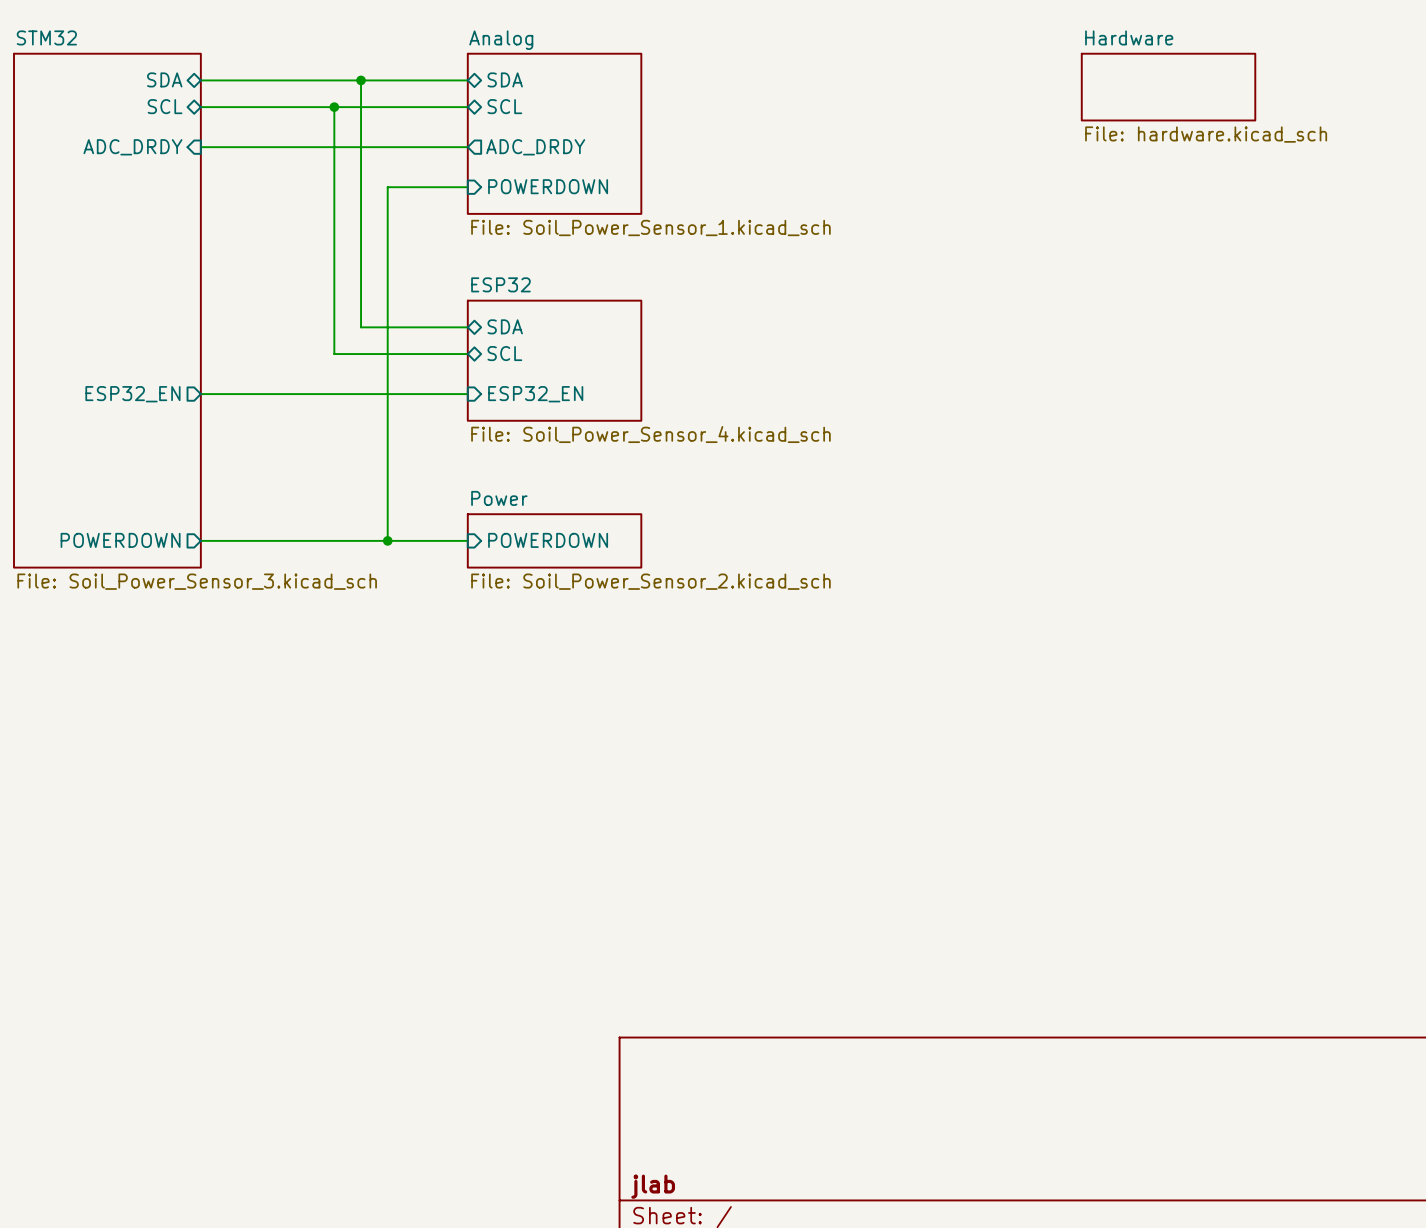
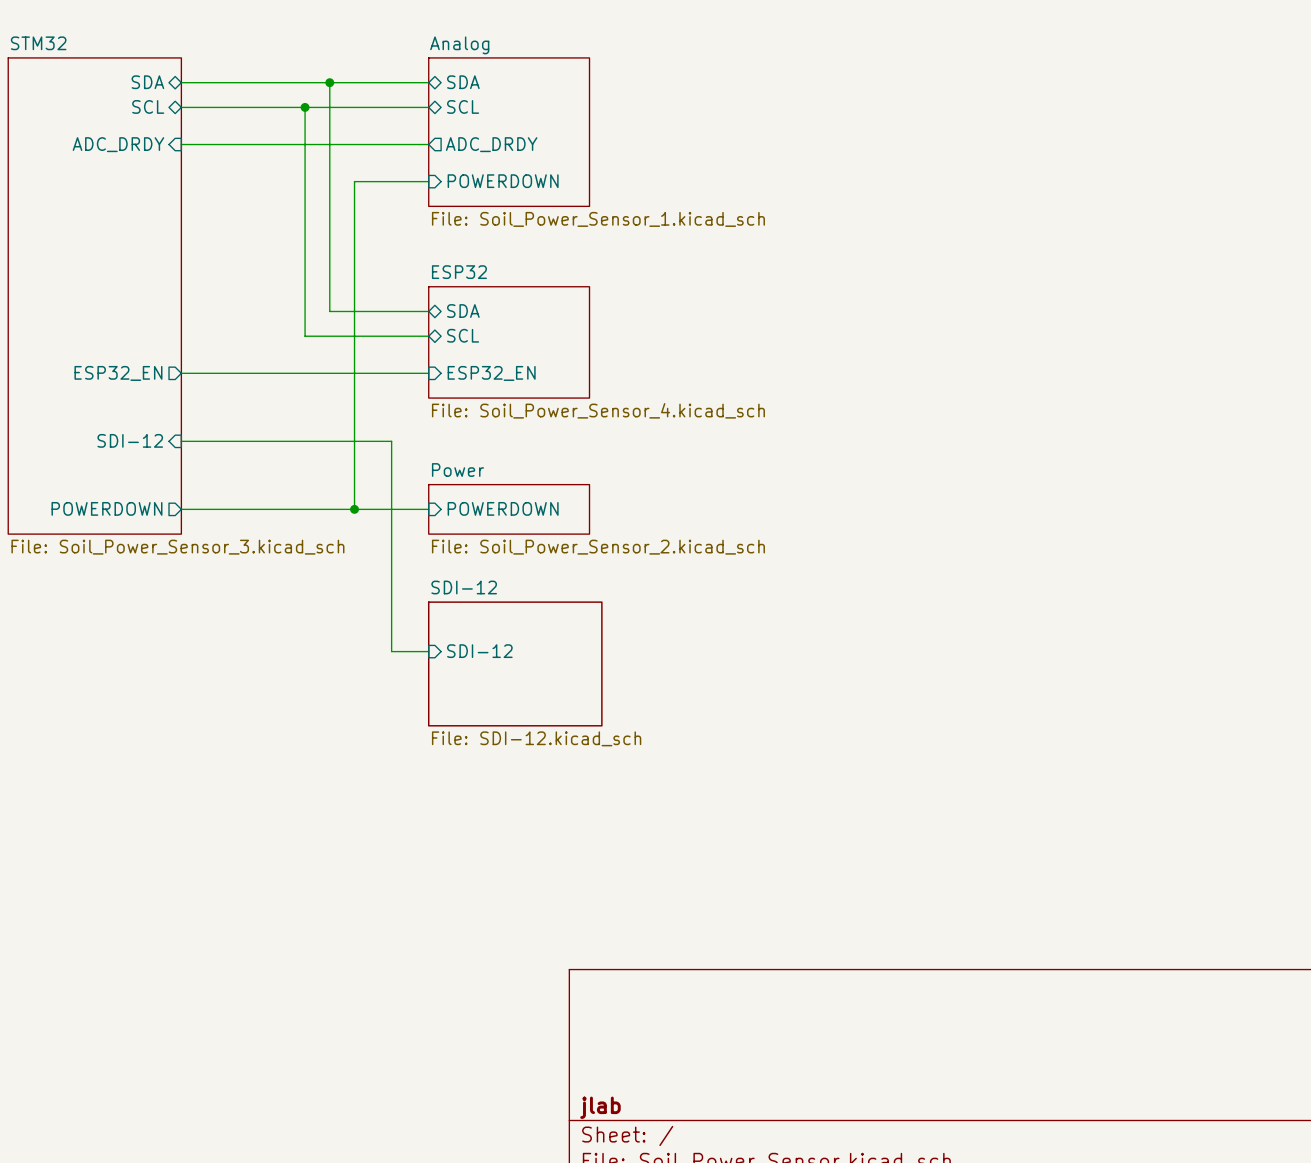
sheet Hardware: File: hardware.kicad_sch (1168, 87) -> none
sheet pin: none -> SDI-12 (130, 440)
wire: none -> (181, 441) (391, 441) (391, 651) (428, 651)
sheet pin: none -> SDI-12 (479, 651)
sheet SDI-12: none -> File: SDI-12.kicad_sch (515, 663)

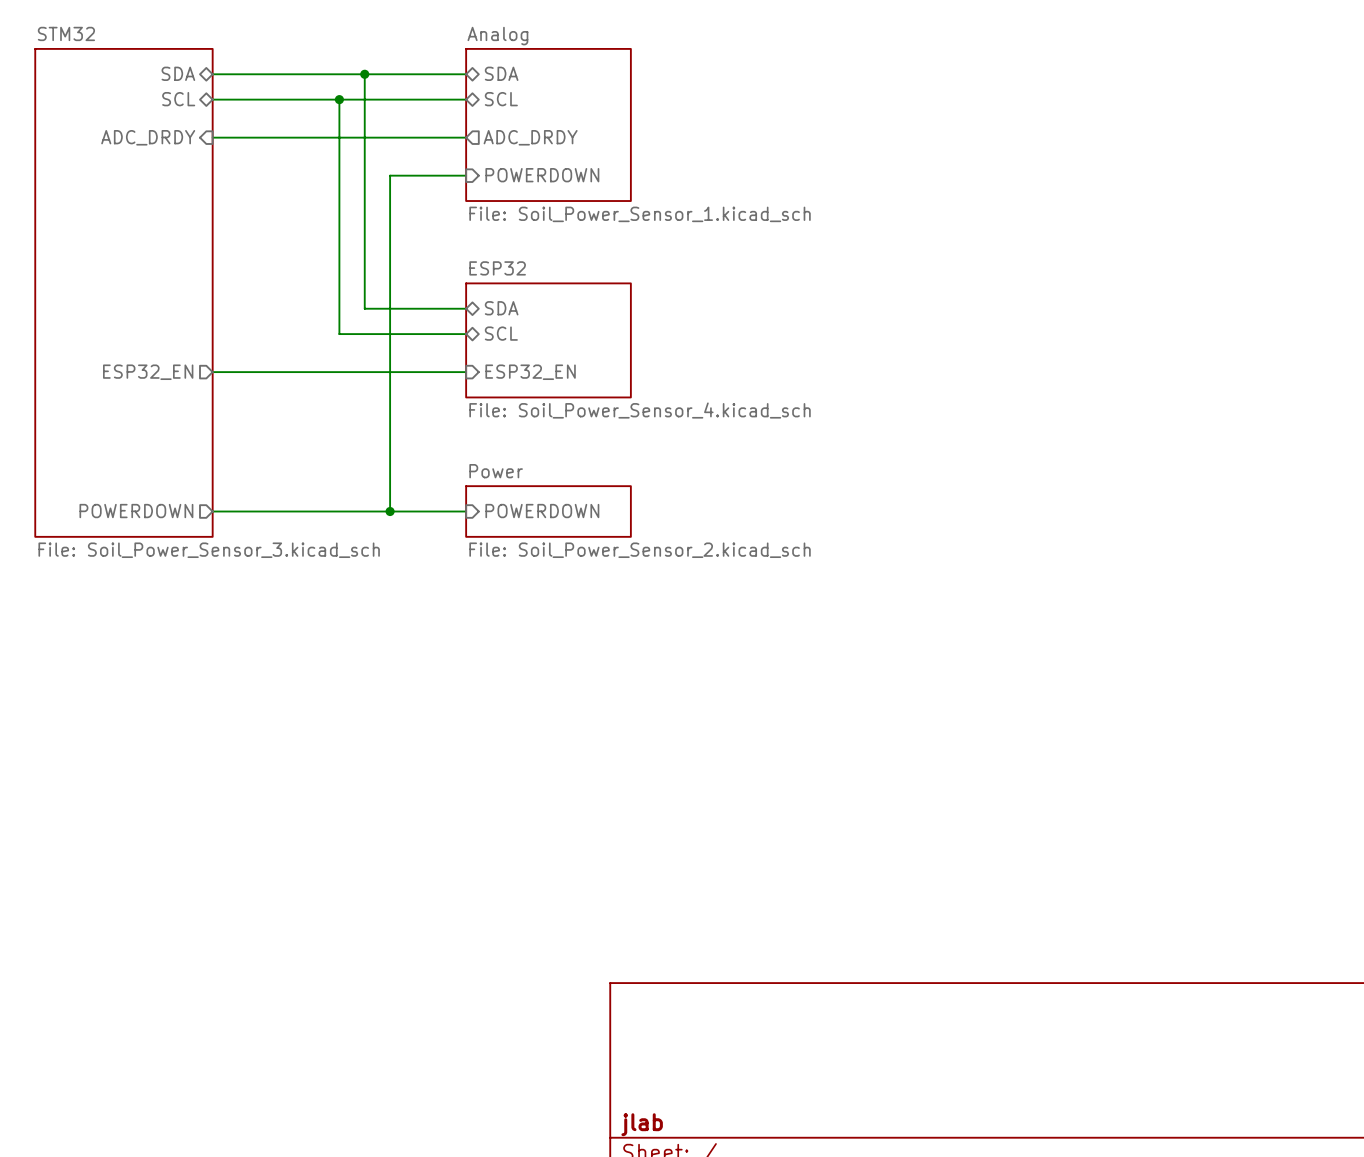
sheet pin: SDI-12 (130, 440) -> none
wire: (181, 441) (391, 441) (391, 651) (428, 651) -> none
sheet pin: SDI-12 (479, 651) -> none
sheet SDI-12: File: SDI-12.kicad_sch (515, 663) -> none

